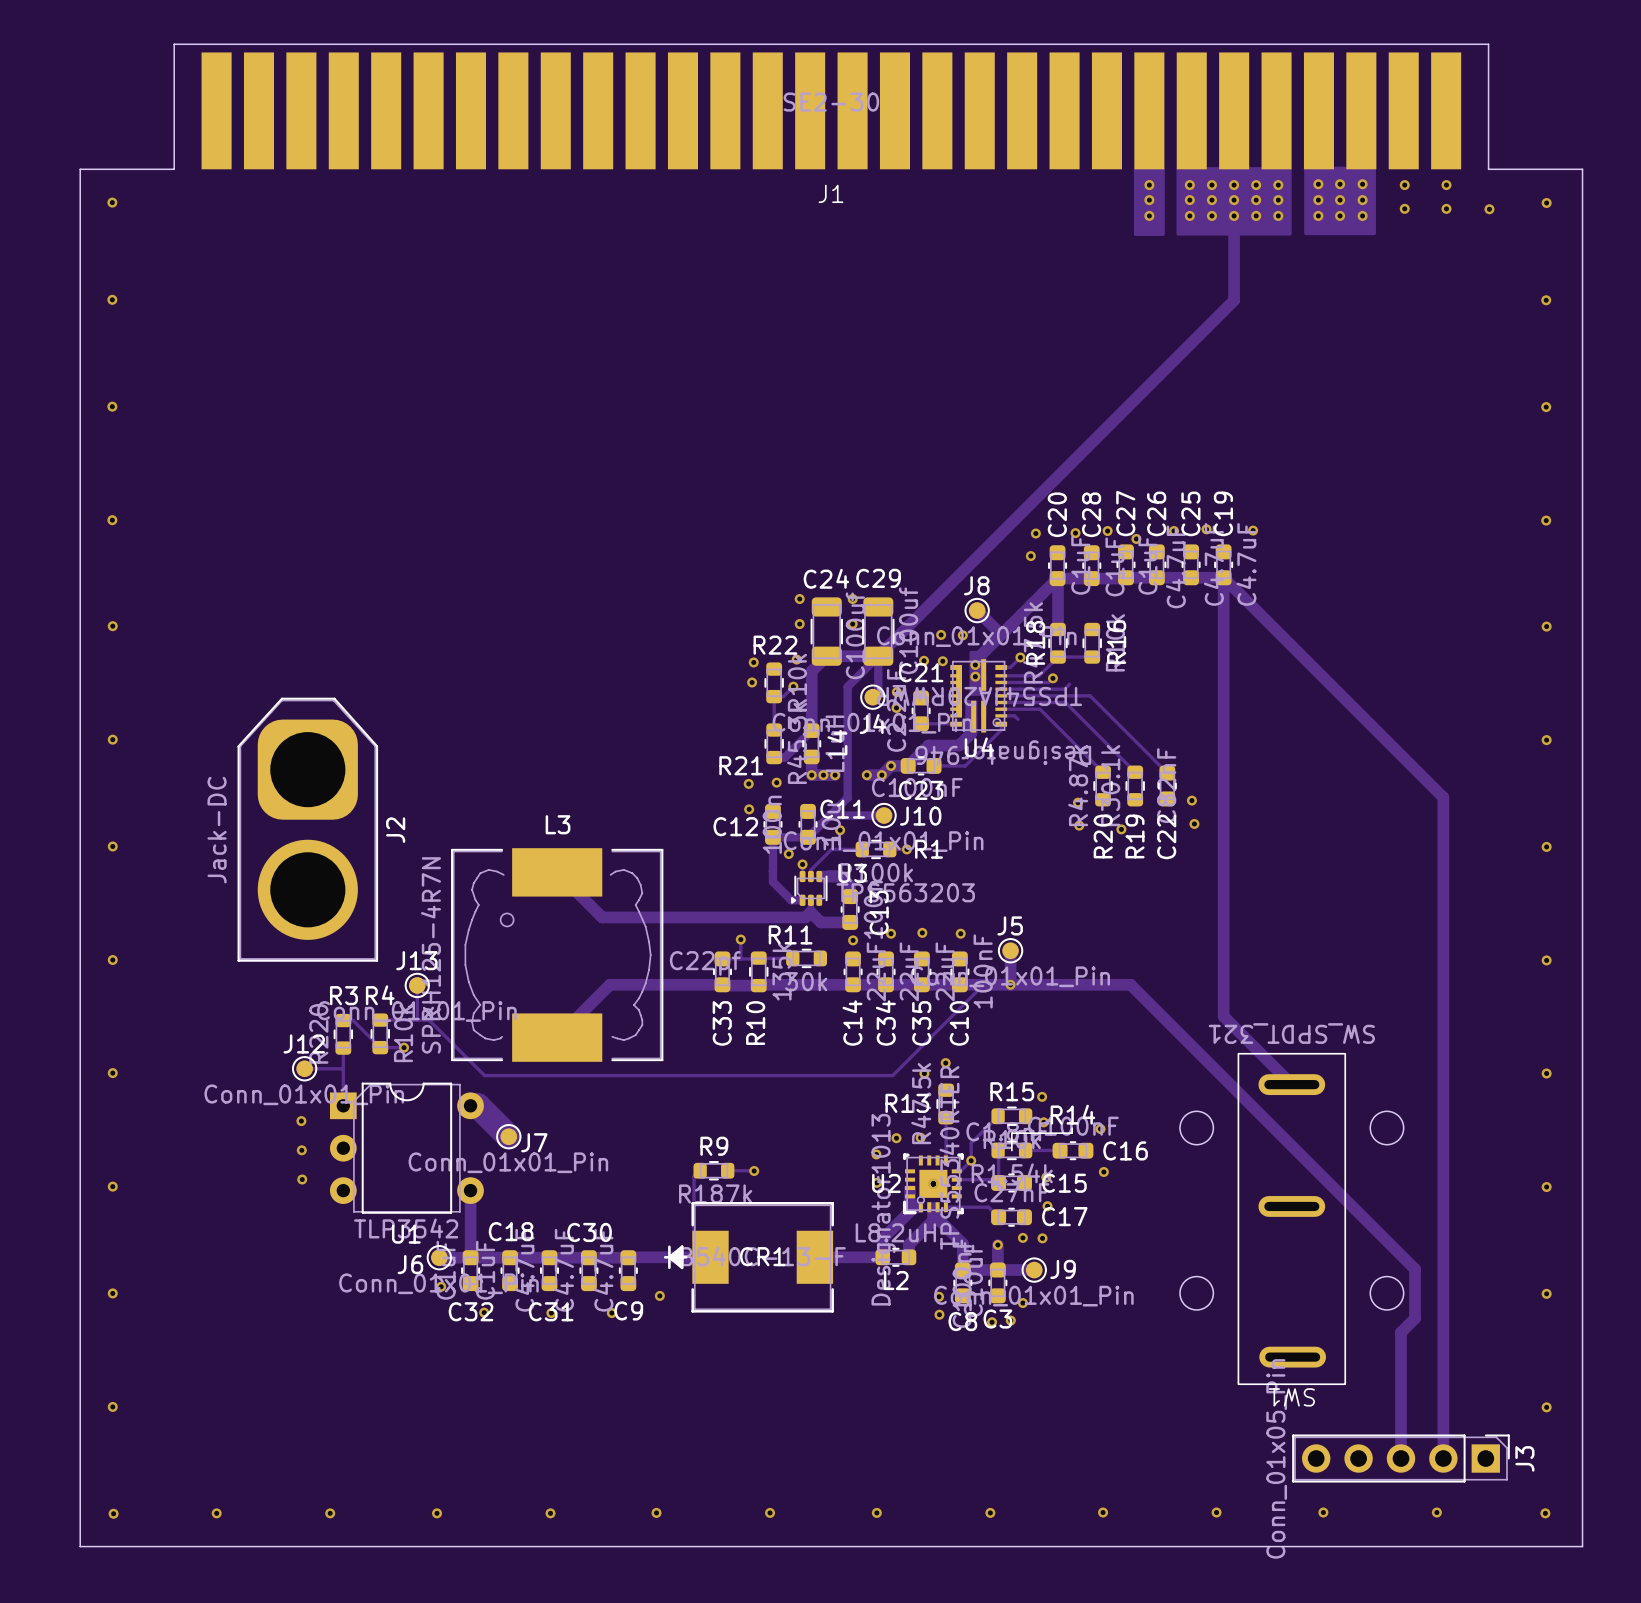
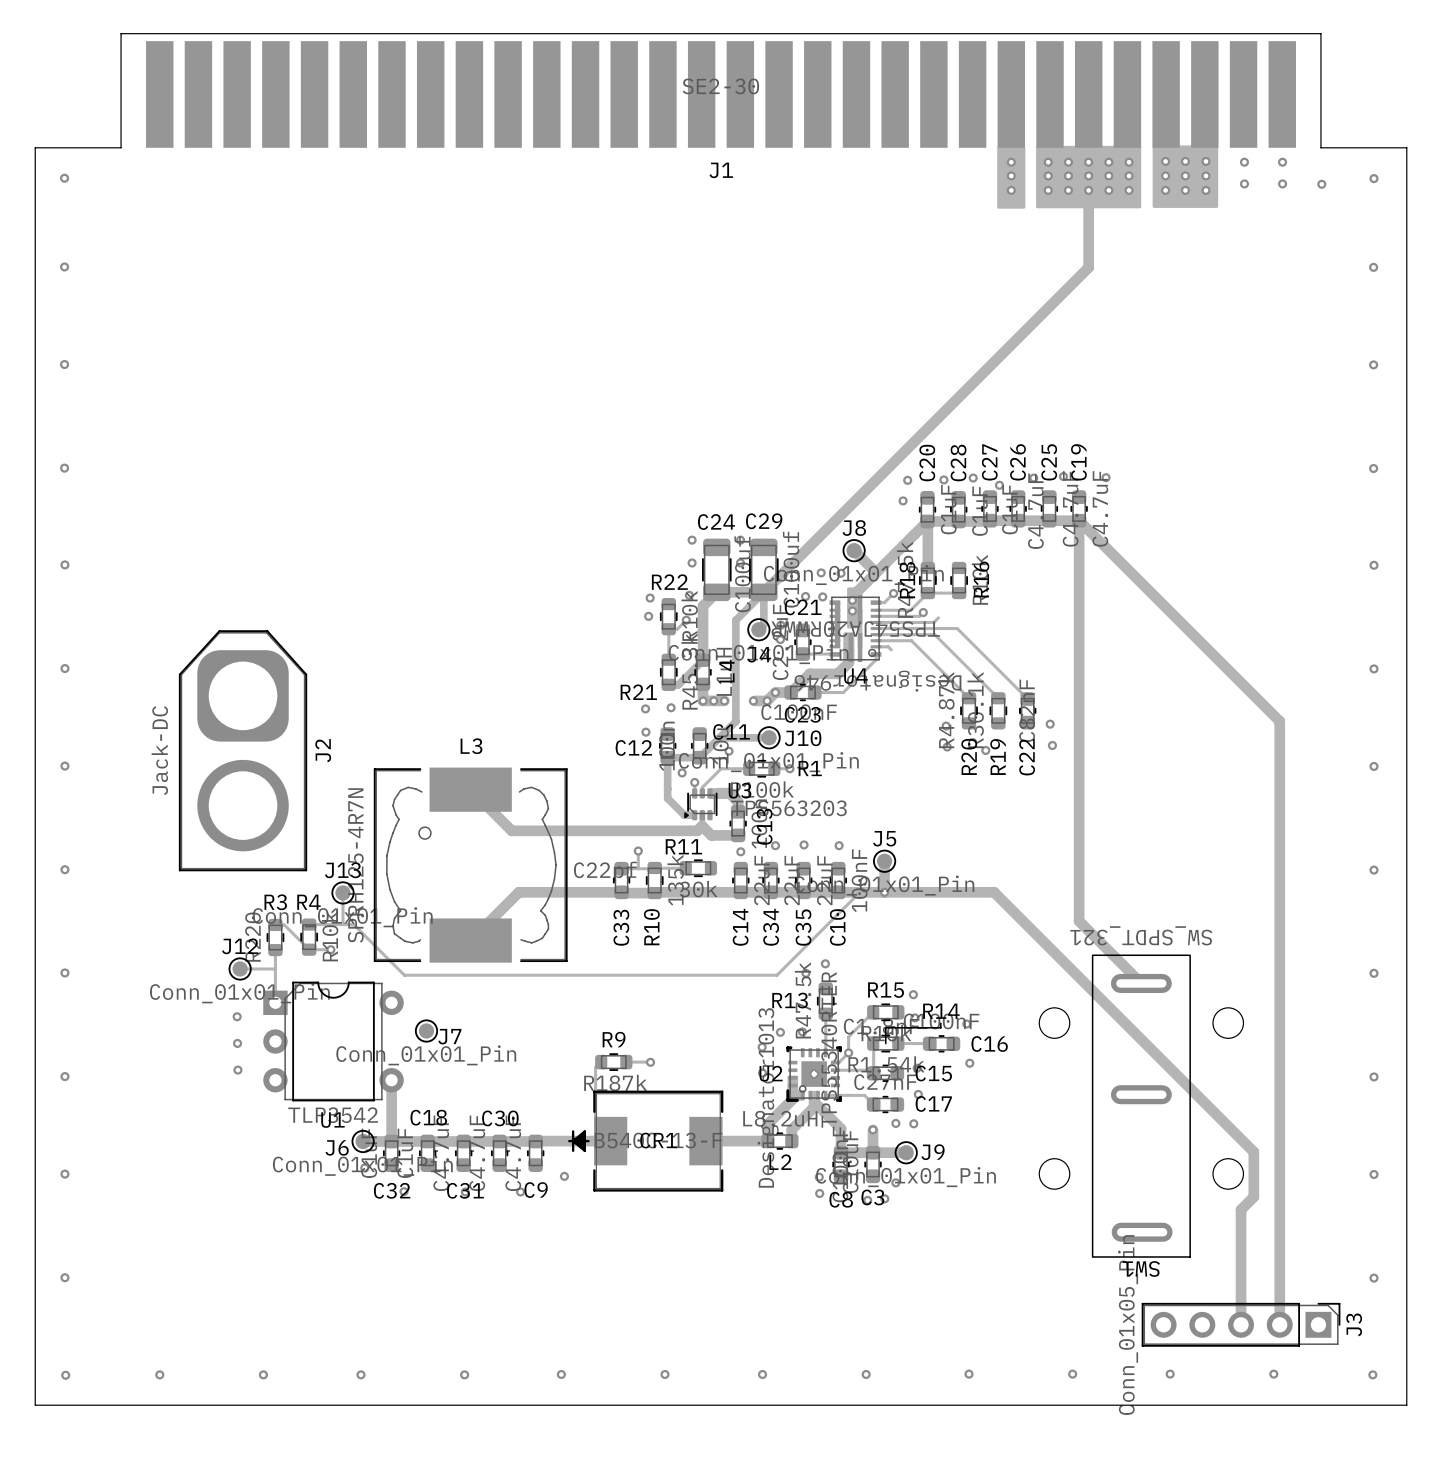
track: (470, 1105) (477, 1105) (508, 1136) -> none

